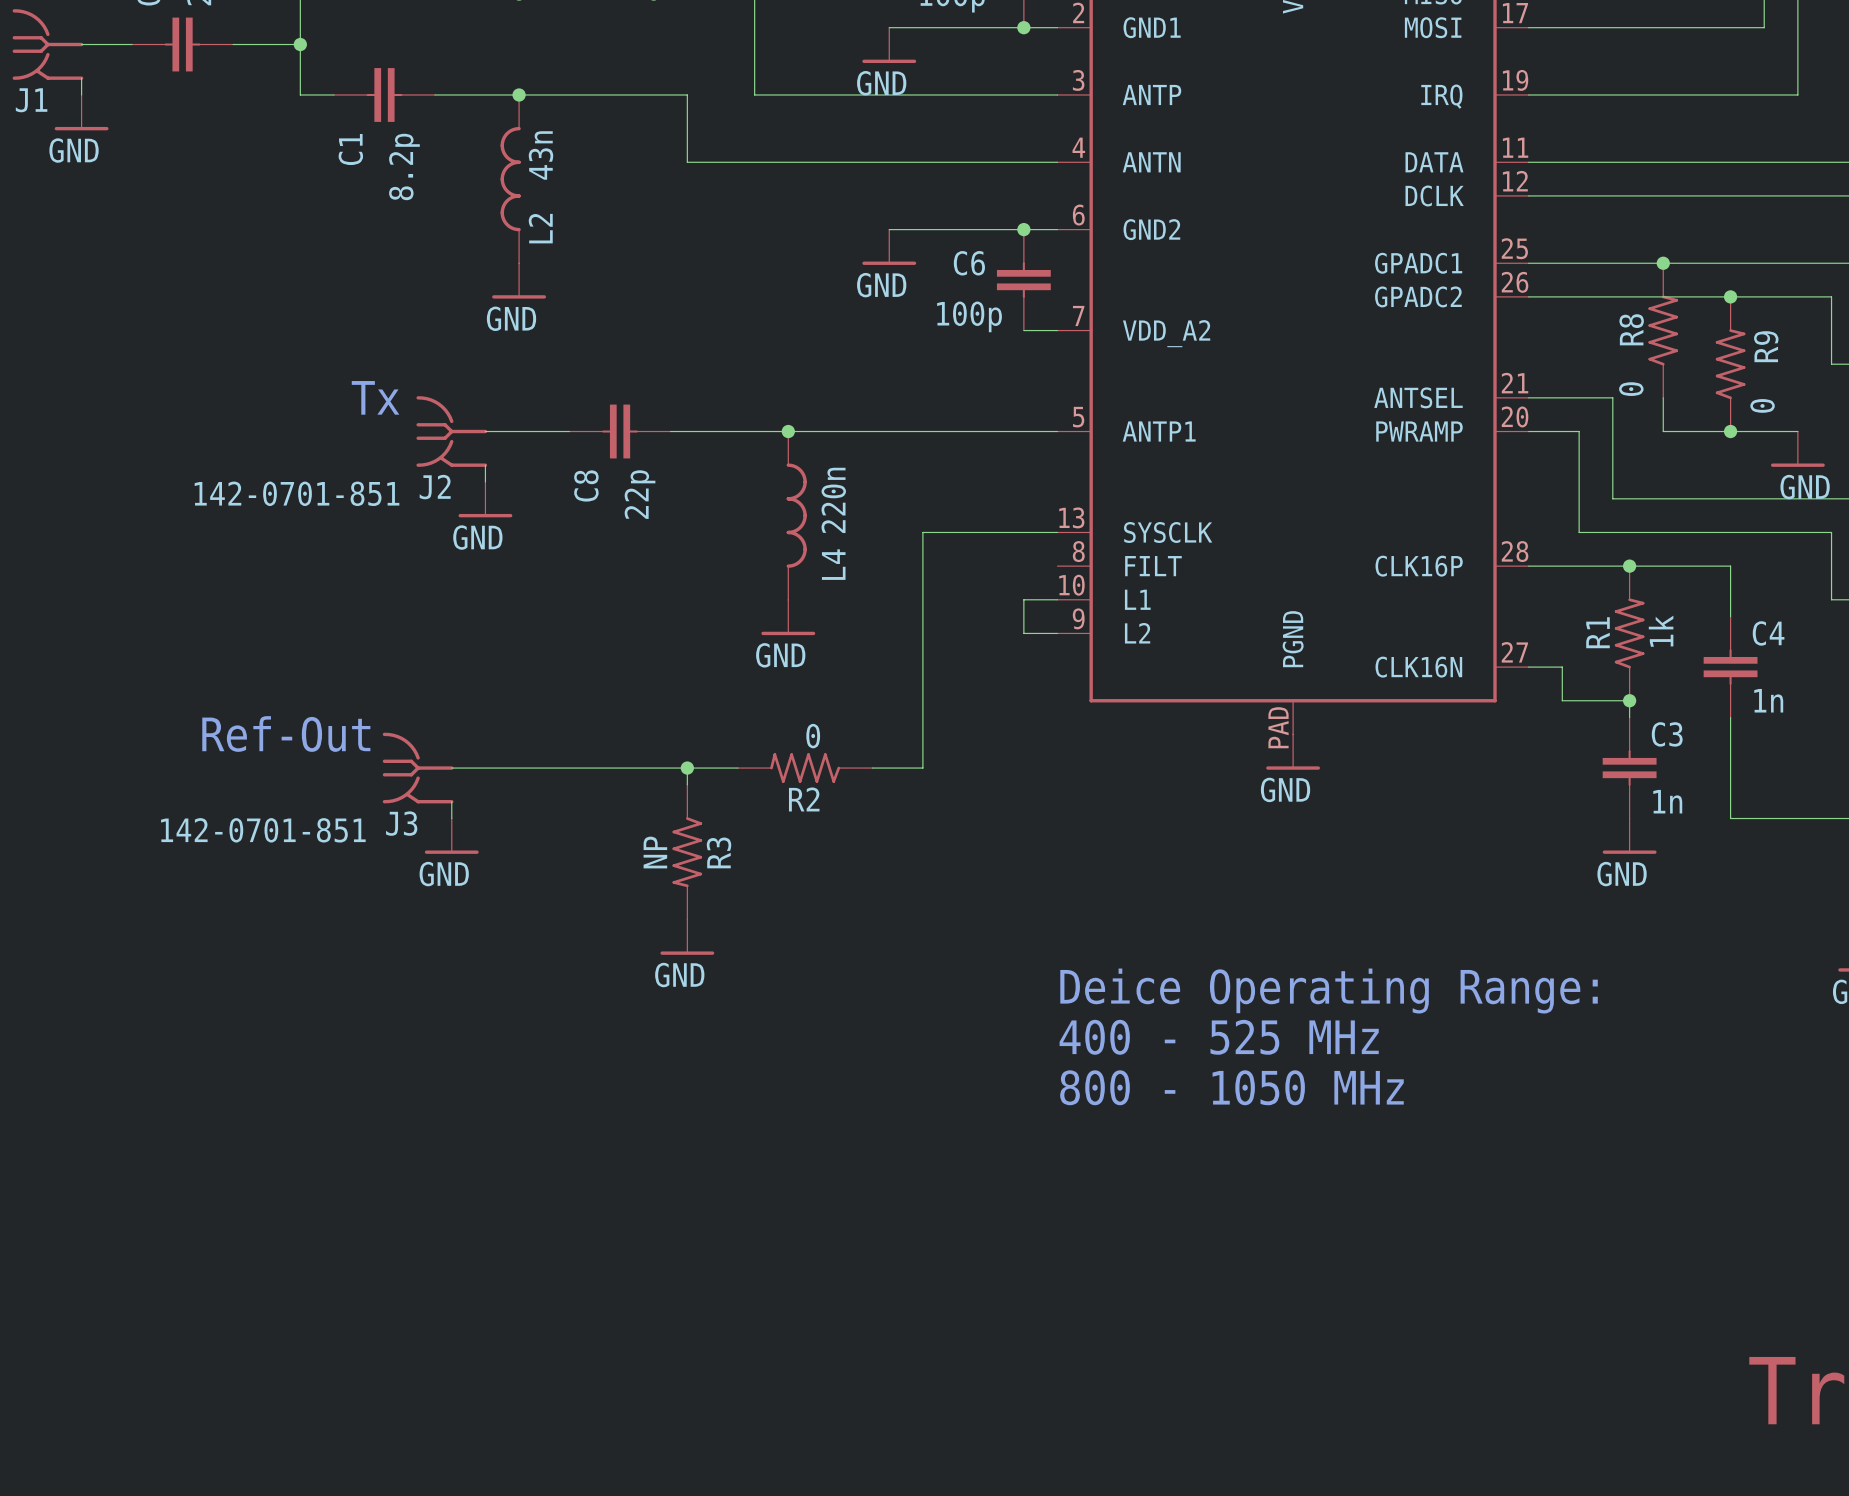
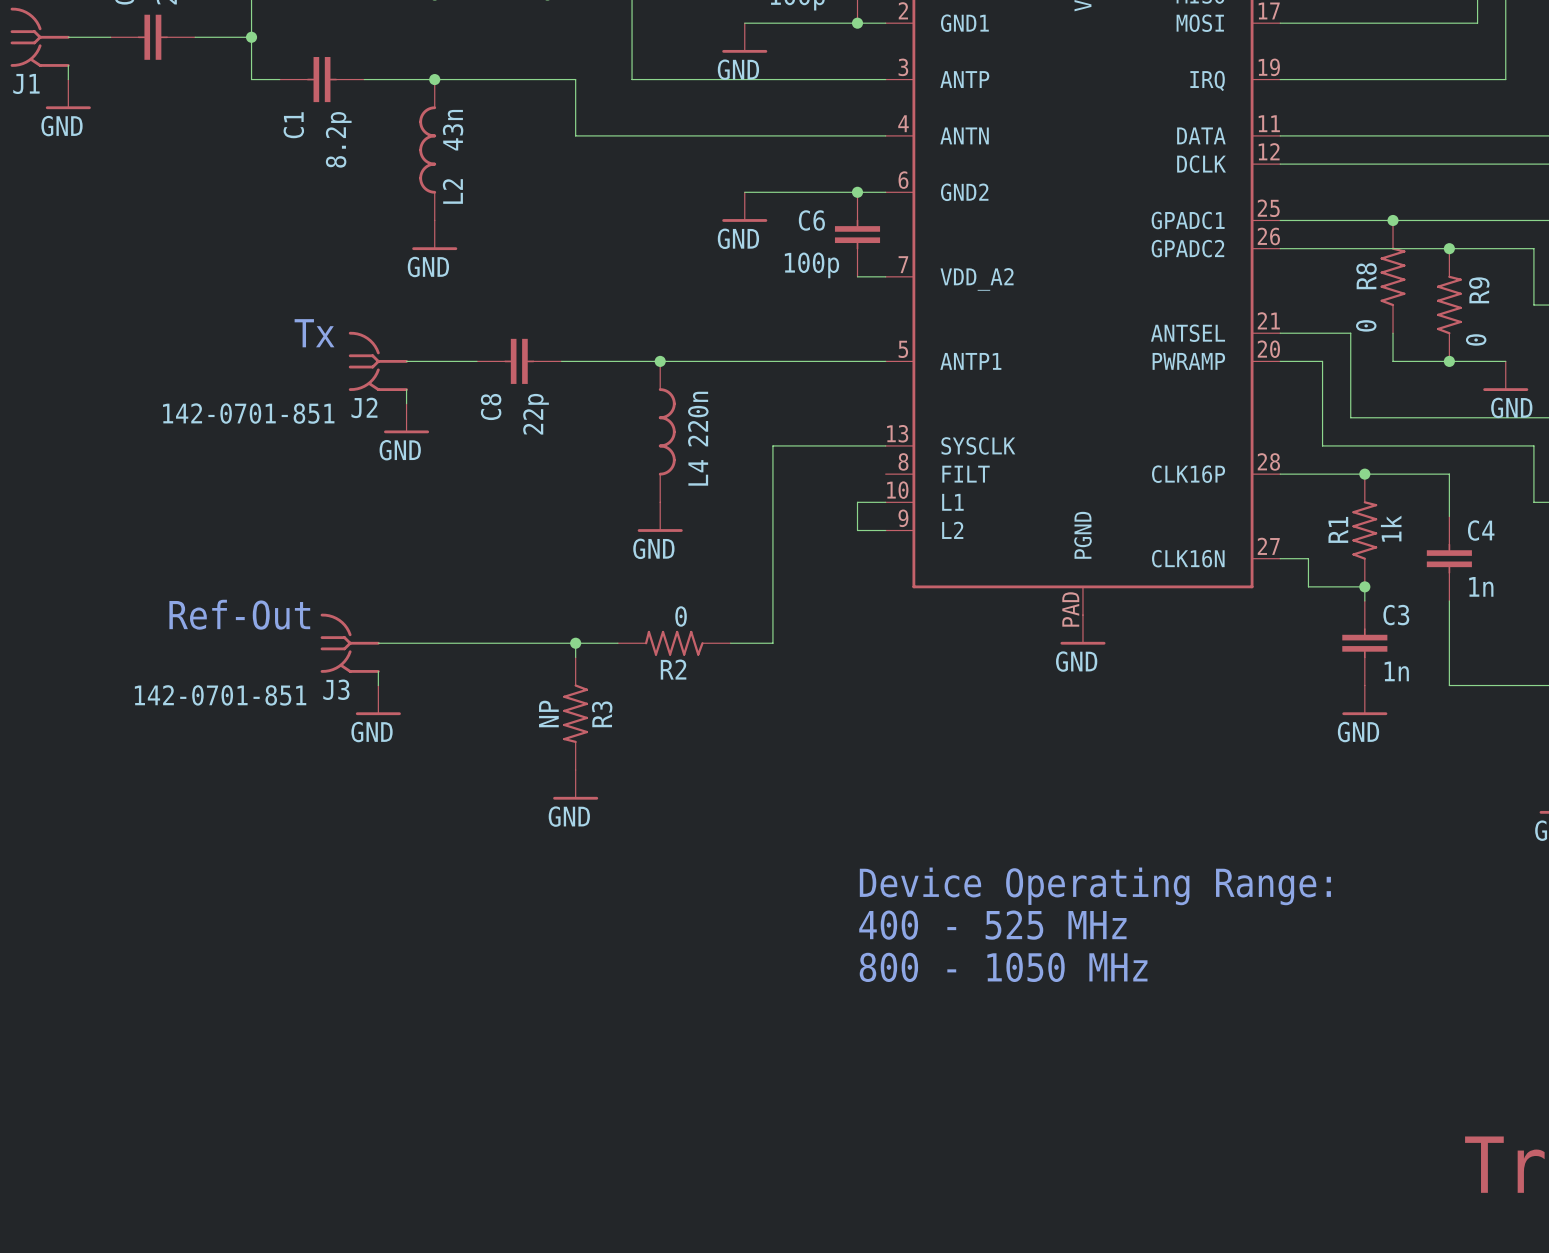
text: Deice Operating Range: (1329, 991) -> Device Operating Range: (1095, 886)
text position: 400 - 525 MHz (1219, 1037) -> 400 - 525 MHz (992, 925)
text position: 800 - 1050 MHz (1231, 1087) -> 800 - 1050 MHz (1003, 967)

